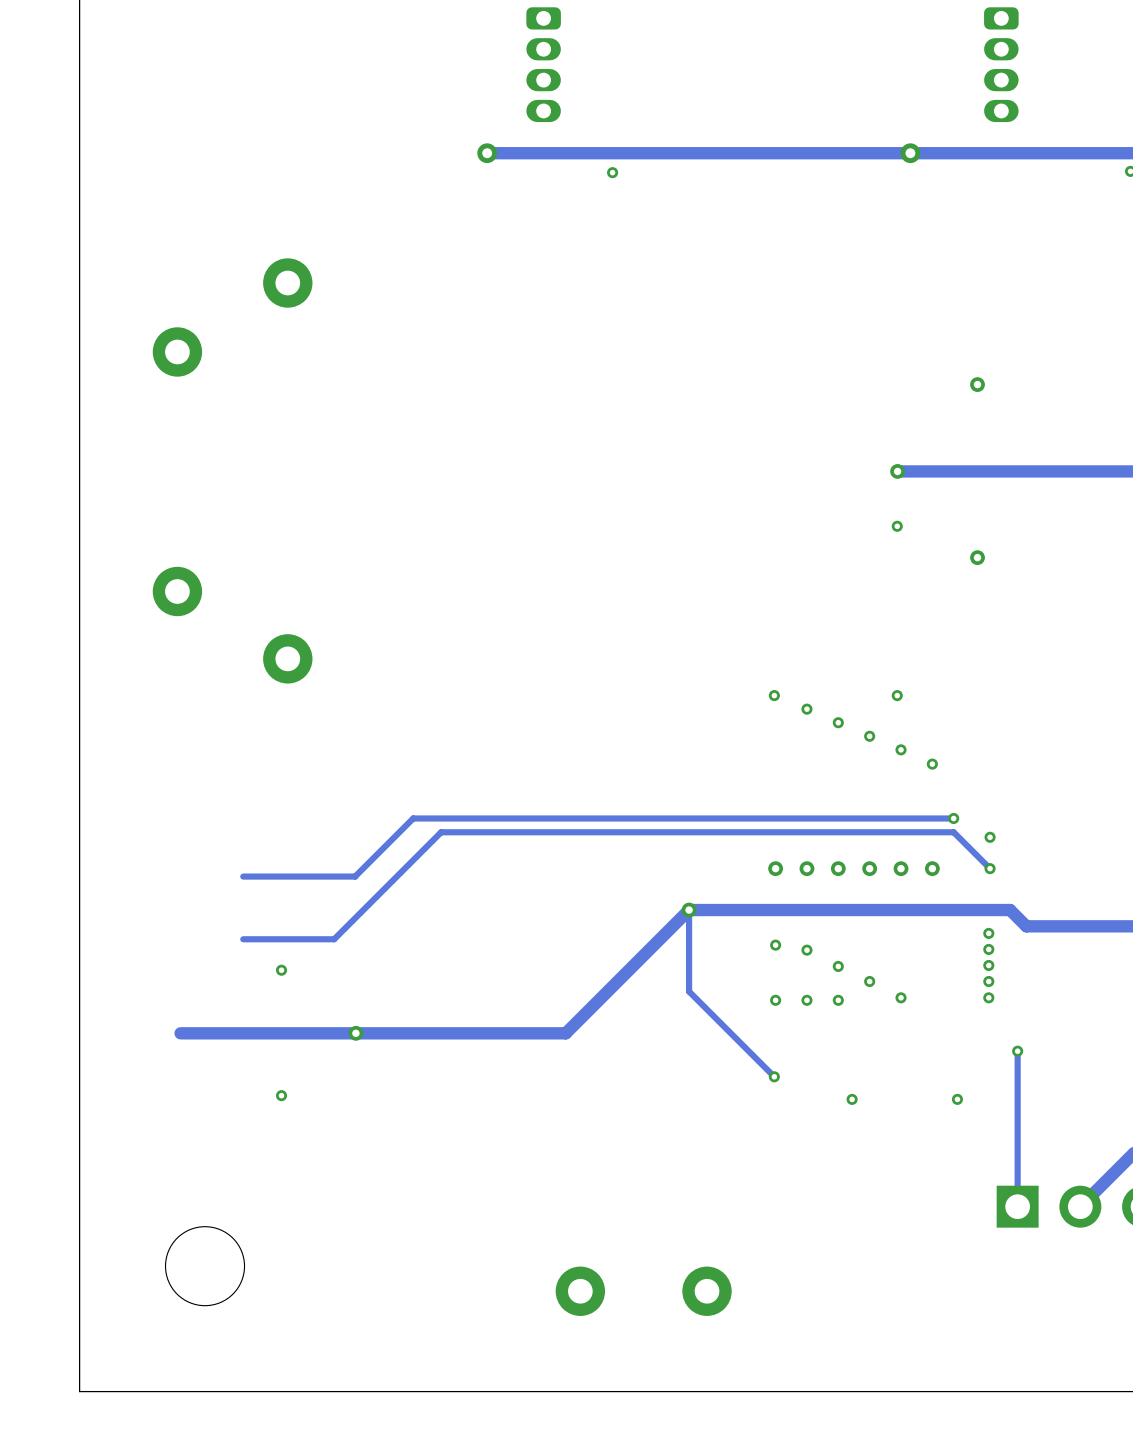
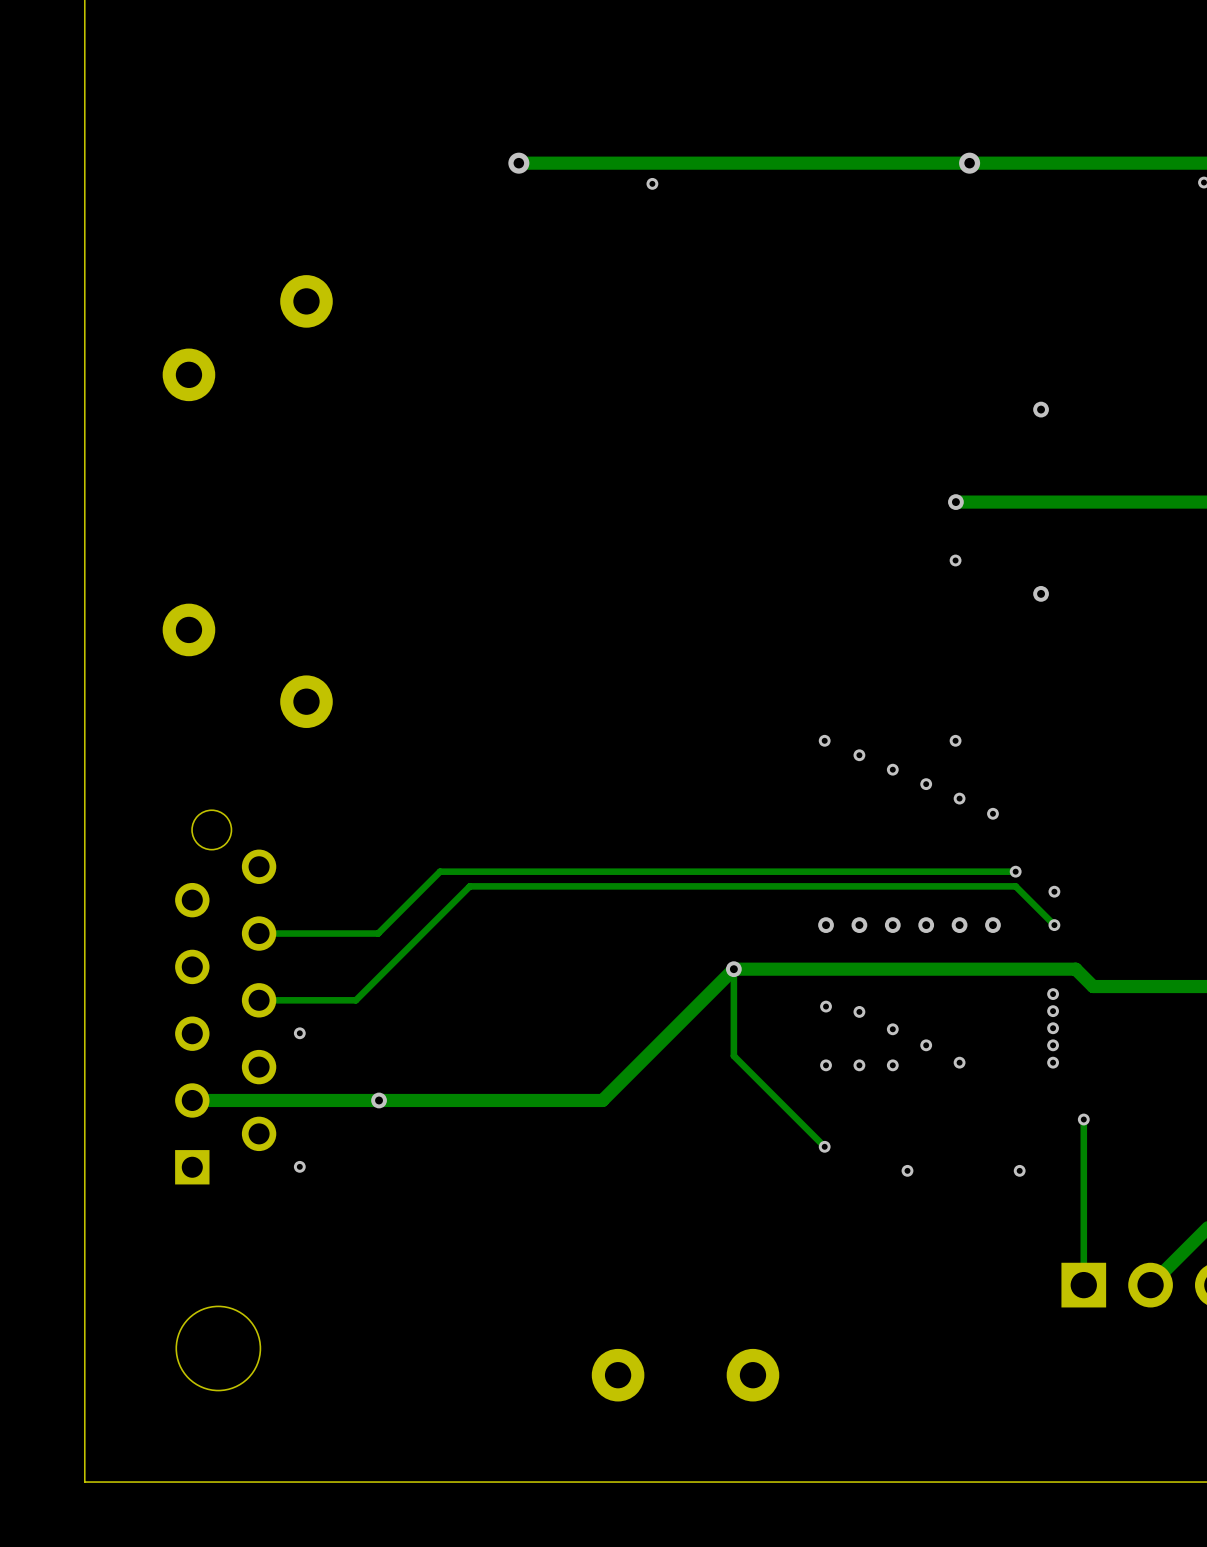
part: (543, 64) -> none
part: (1001, 64) -> none
part: none -> (225, 997)

